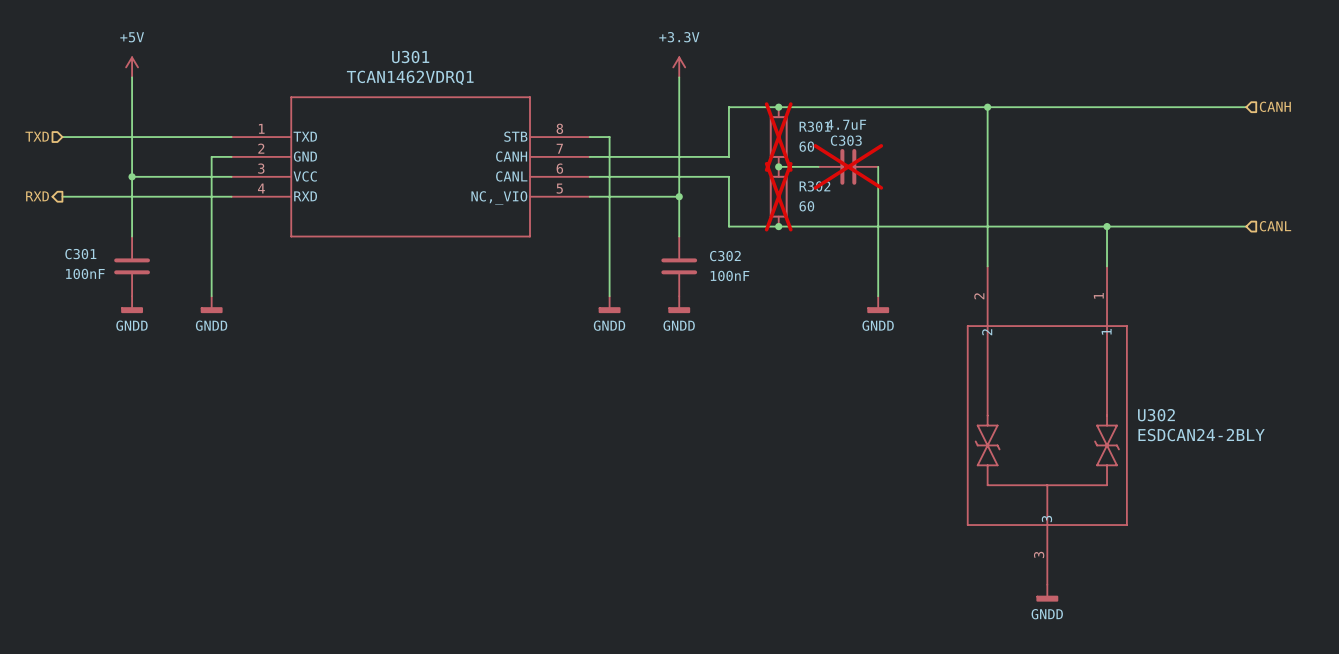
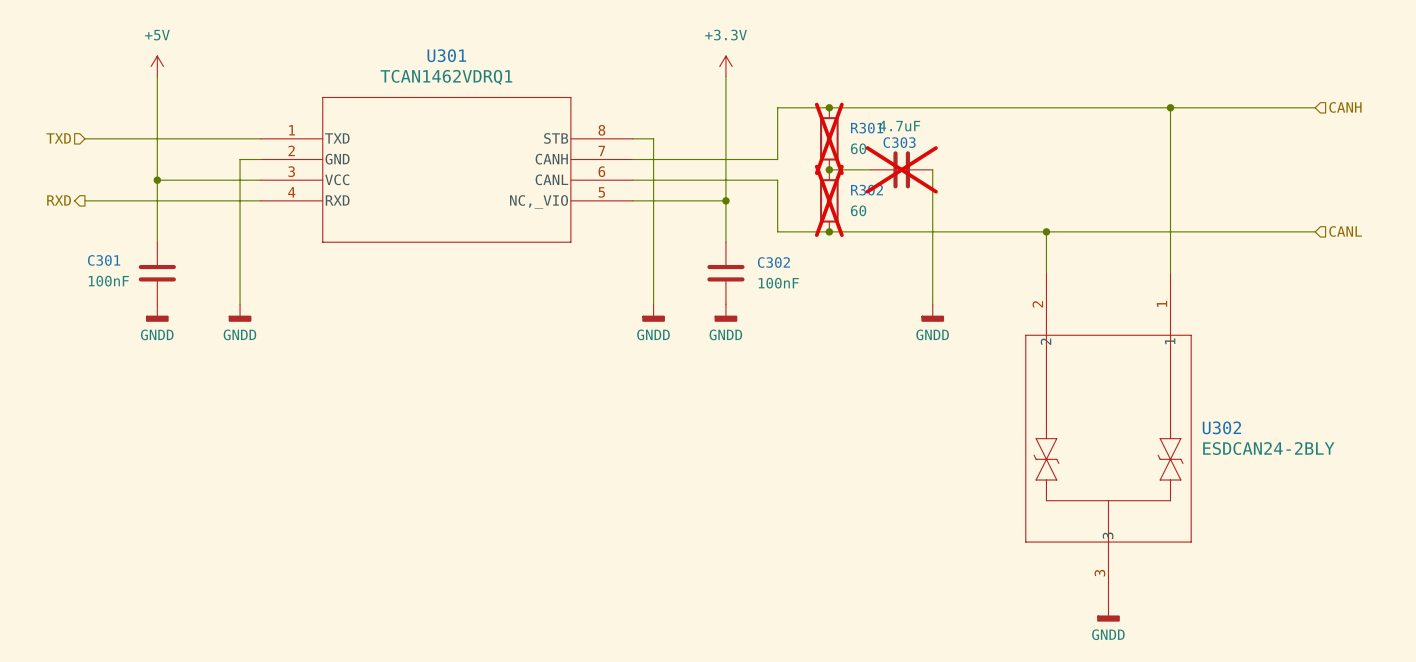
wire: (987, 107) (987, 226) -> (1170, 107) (1170, 231)
junction: (987, 107) -> none
junction: none -> (1170, 107)
junction: none -> (1046, 231)
junction: (1107, 226) -> none

